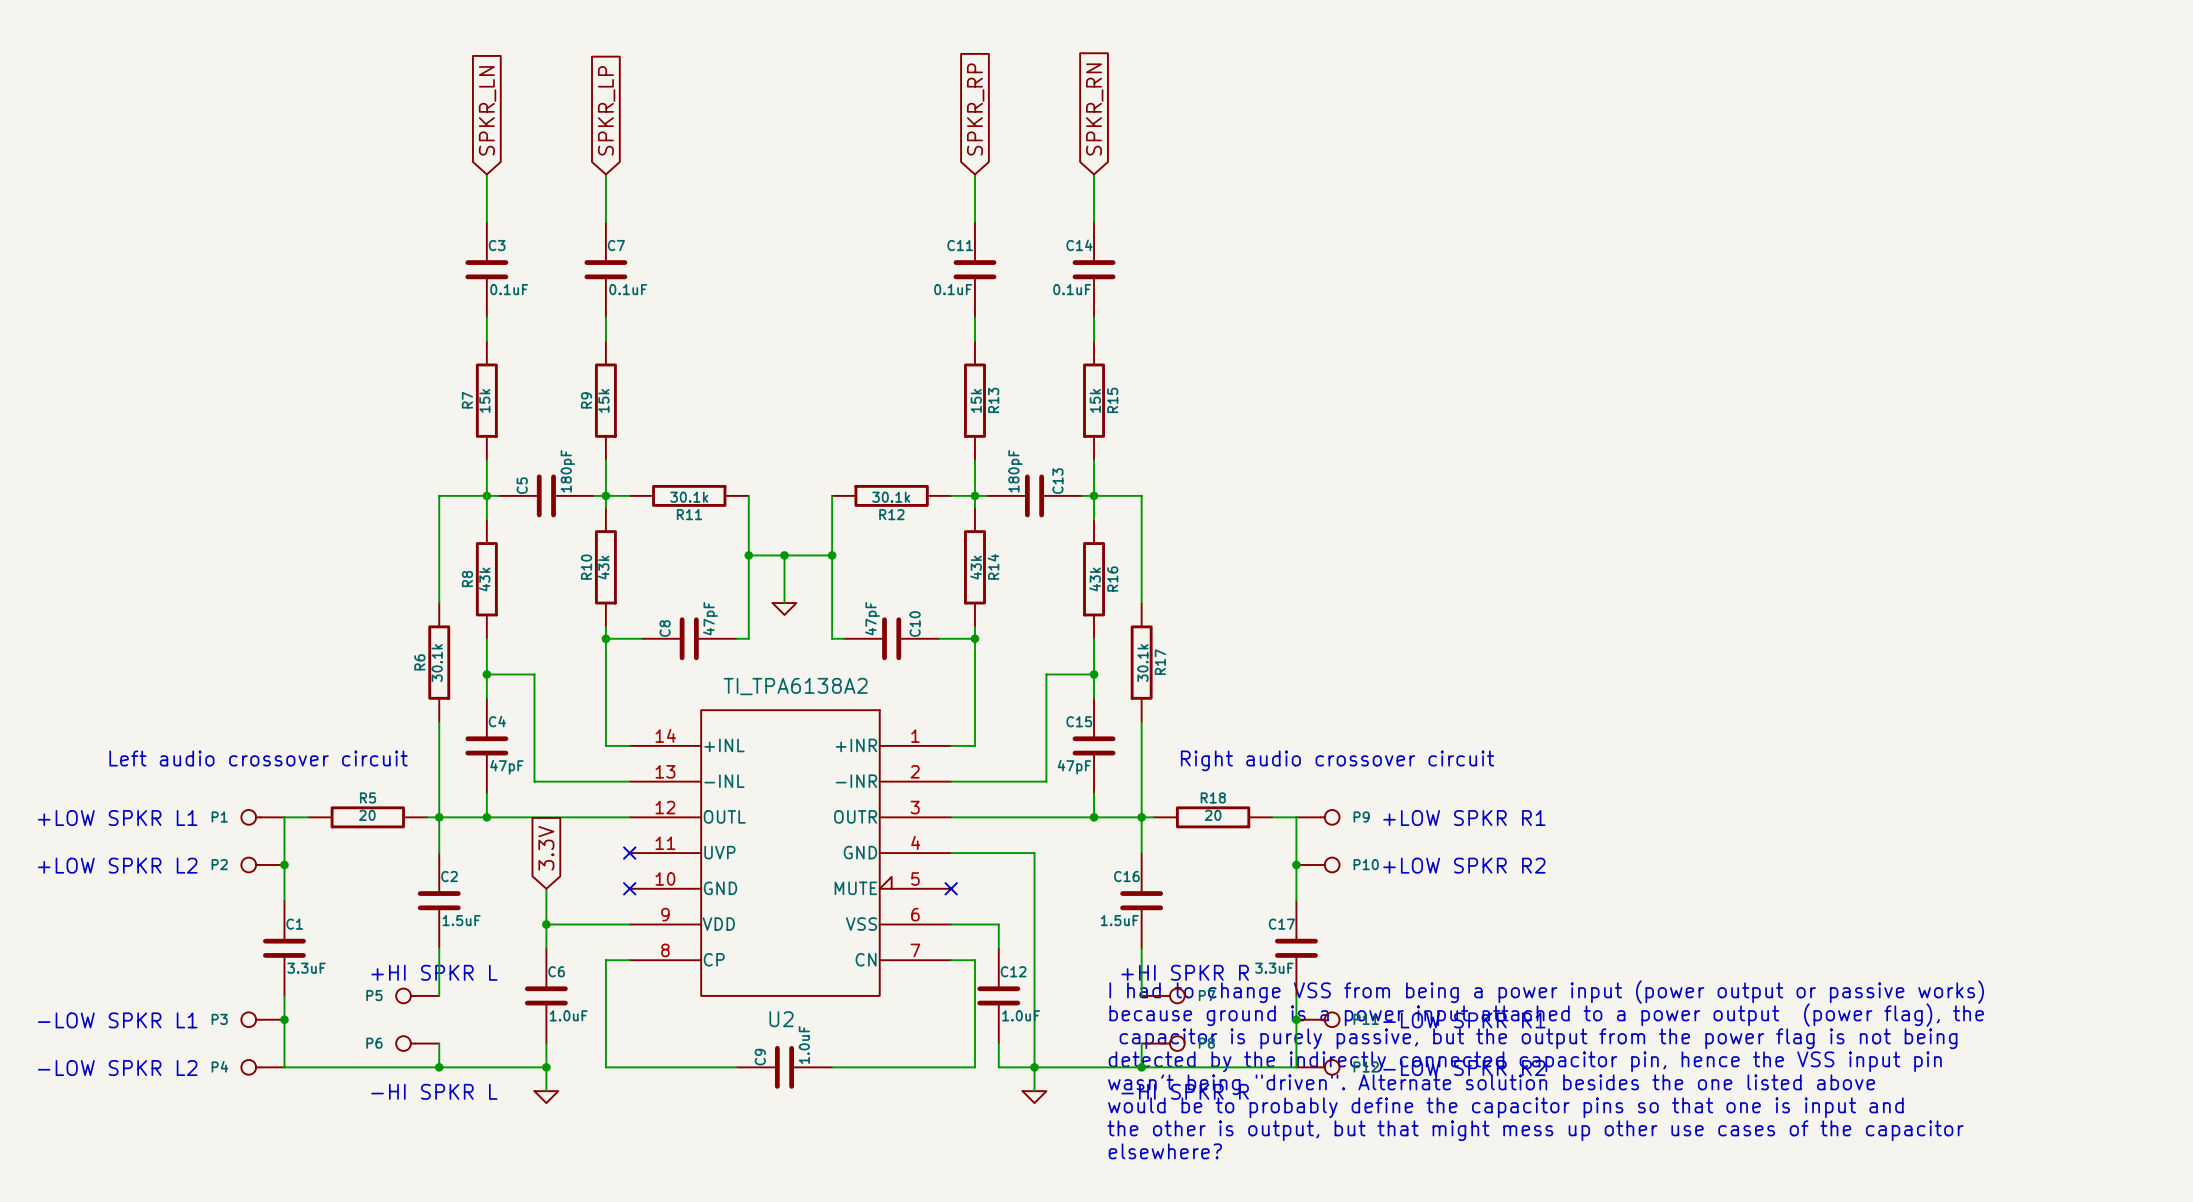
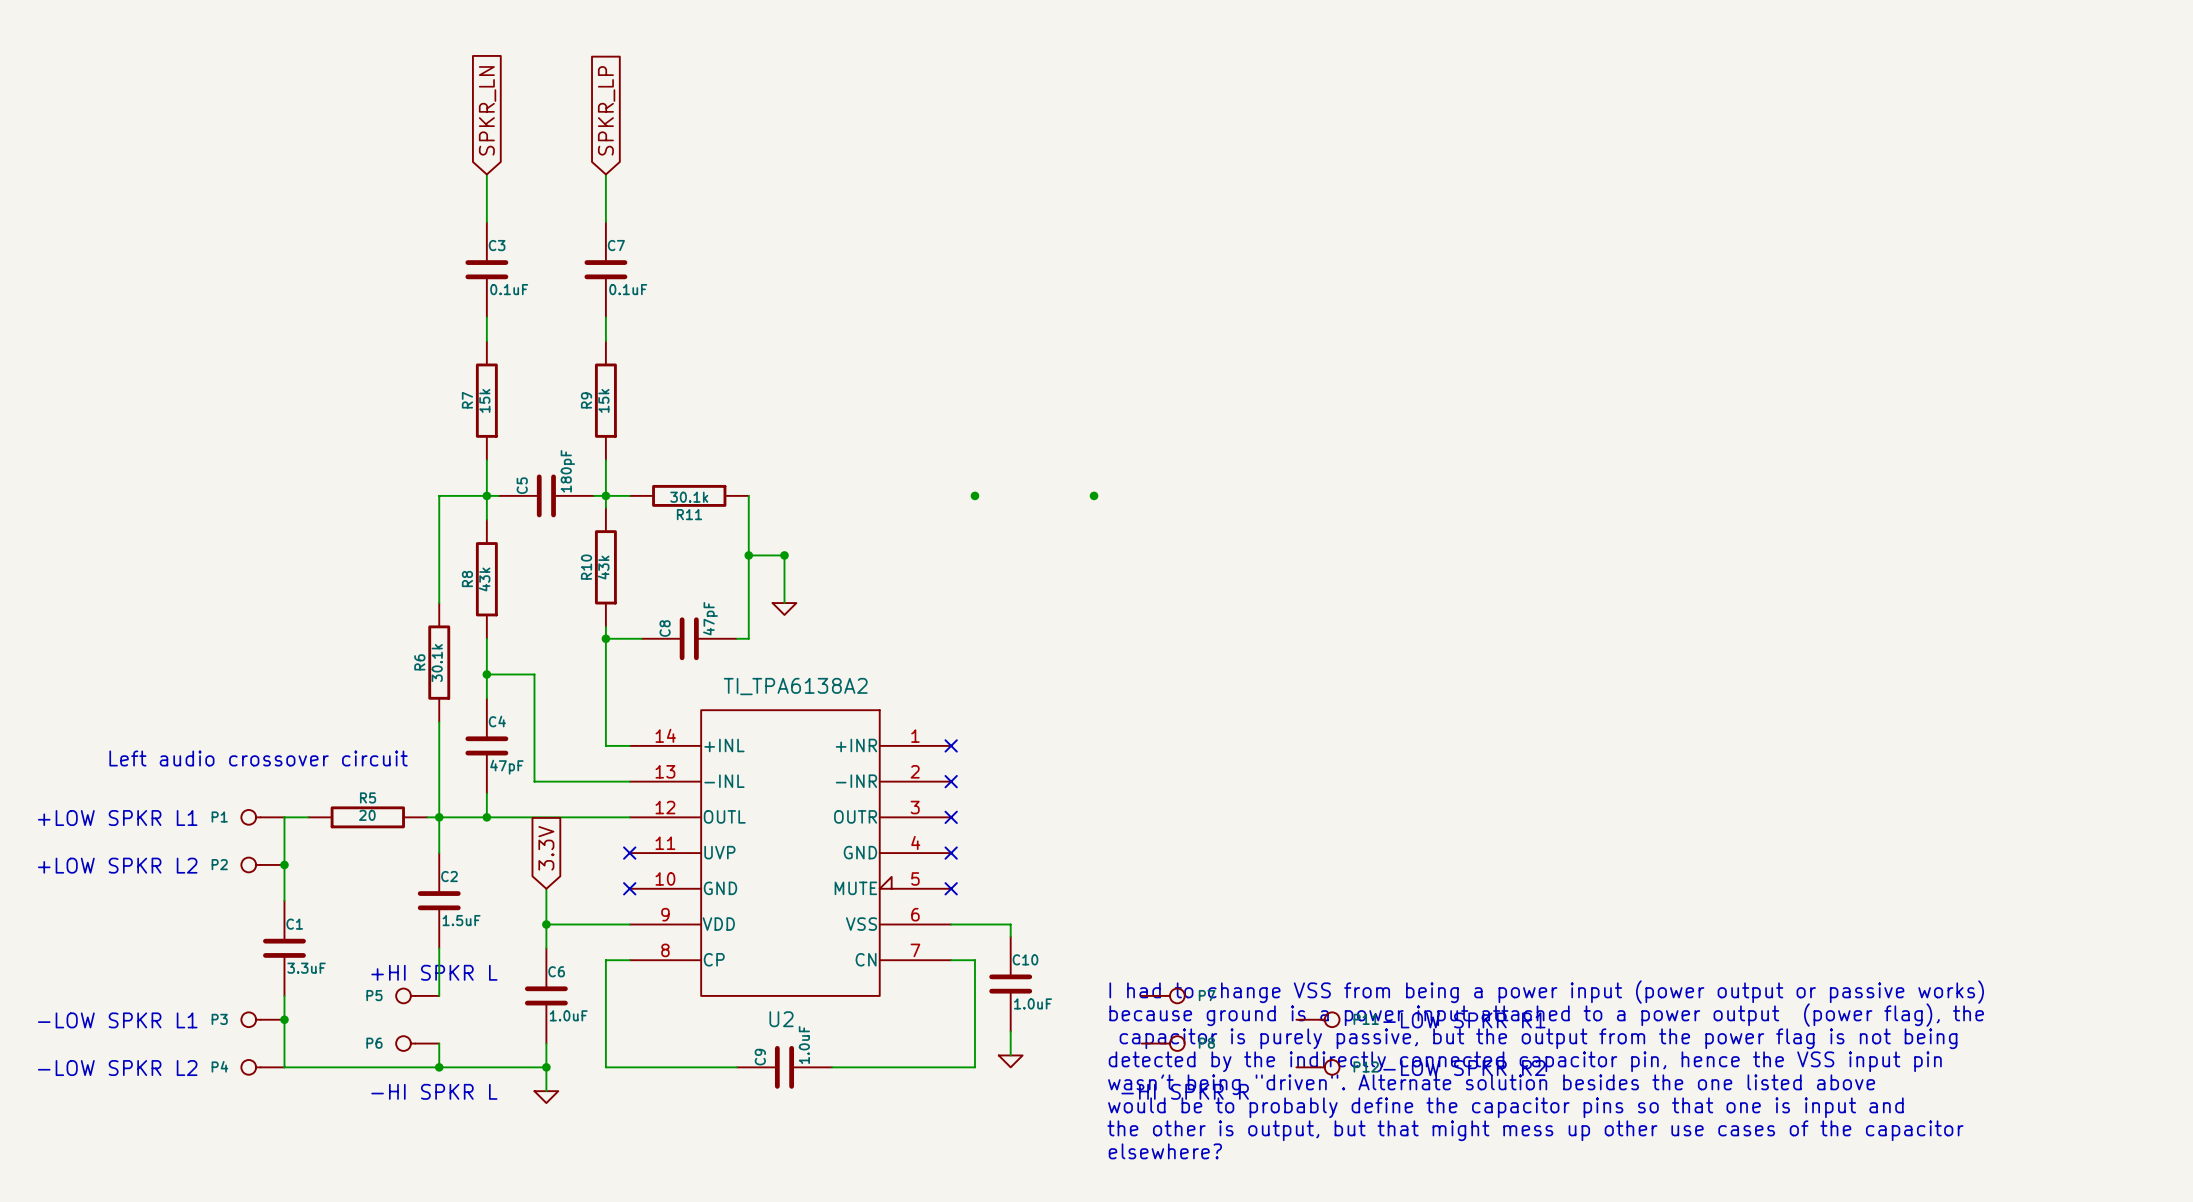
global label: SPKR_RP (975, 109) -> none
global label: SPKR_RN (1094, 109) -> none
wire: (974, 174) (974, 222) -> none
wire: (1094, 174) (1094, 222) -> none
C11: 0.1uF (974, 269) -> none
C14: 0.1uF (1094, 269) -> none
wire: (974, 317) (974, 341) -> none
wire: (1094, 317) (1094, 341) -> none
R13: 15k (974, 400) -> none
R15: 15k (1094, 400) -> none
wire: (974, 460) (974, 507) -> none
wire: (1094, 460) (1094, 519) -> none
wire: (832, 495) (832, 638) (844, 638) -> none
R12: 30.1k (891, 495) -> none
wire: (951, 495) (986, 495) -> none
C13: 180pF (1034, 495) -> none
wire: (1082, 495) (1141, 495) (1141, 603) -> none
wire: (784, 555) (832, 555) -> none
junction: (832, 555) -> none
R14: 43k (974, 567) -> none
R16: 43k (1094, 579) -> none
C10 value: 47pF (872, 618) -> 1.0uF (1033, 1003)
wire: (974, 626) (974, 745) (951, 745) -> none
C10 rotation: 0° (891, 638) -> 90° clockwise (1010, 984)
C10 position: (891, 638) -> (1010, 984)
wire: (939, 638) (974, 638) -> none
junction: (974, 638) -> none
wire: (1094, 638) (1094, 698) -> none
R17: 30.1k (1141, 662) -> none
wire: (1094, 674) (1046, 674) (1046, 781) (951, 781) -> none
junction: (1094, 674) -> none
wire: (1141, 722) (1141, 853) -> none
no-connect mark: none -> (951, 745)
C15: 47pF (1094, 745) -> none
text: Right audio crossover circuit (1337, 760) -> none
no-connect mark: none -> (951, 781)
wire: (1094, 793) (1094, 817) -> none
wire: (951, 817) (1153, 817) -> none
no-connect mark: none -> (951, 817)
junction: (1094, 817) -> none
junction: (1141, 817) -> none
R18: 20 (1213, 817) -> none
wire: (1272, 817) (1296, 817) (1296, 900) -> none
P9: (1317, 817) -> none
text: +LOW SPKR R1 (1464, 818) -> none
wire: (951, 853) (1034, 853) (1034, 1091) -> none
no-connect mark: none -> (951, 853)
junction: (1296, 864) -> none
P10: (1317, 864) -> none
text: +LOW SPKR R2 (1464, 865) -> none
C16: 1.5uF (1141, 900) -> none
wire: (998, 924) (998, 948) -> (998, 924) (1010, 924) (1010, 936)
wire: (1141, 948) (1141, 995) -> none
C17: 3.3uF (1296, 948) -> none
text: +HI SPKR R (1185, 972) -> none
C12: 1.0uF (998, 995) -> none
wire: (1296, 995) (1296, 1067) (998, 1067) (998, 1043) -> none
junction: (1296, 1019) -> none
wire: (1141, 1043) (1141, 1067) -> (1010, 1031) (1010, 1055)
junction: (1034, 1067) -> none
junction: (1141, 1067) -> none
power symbol position: (1034, 1097) -> (1010, 1061)

